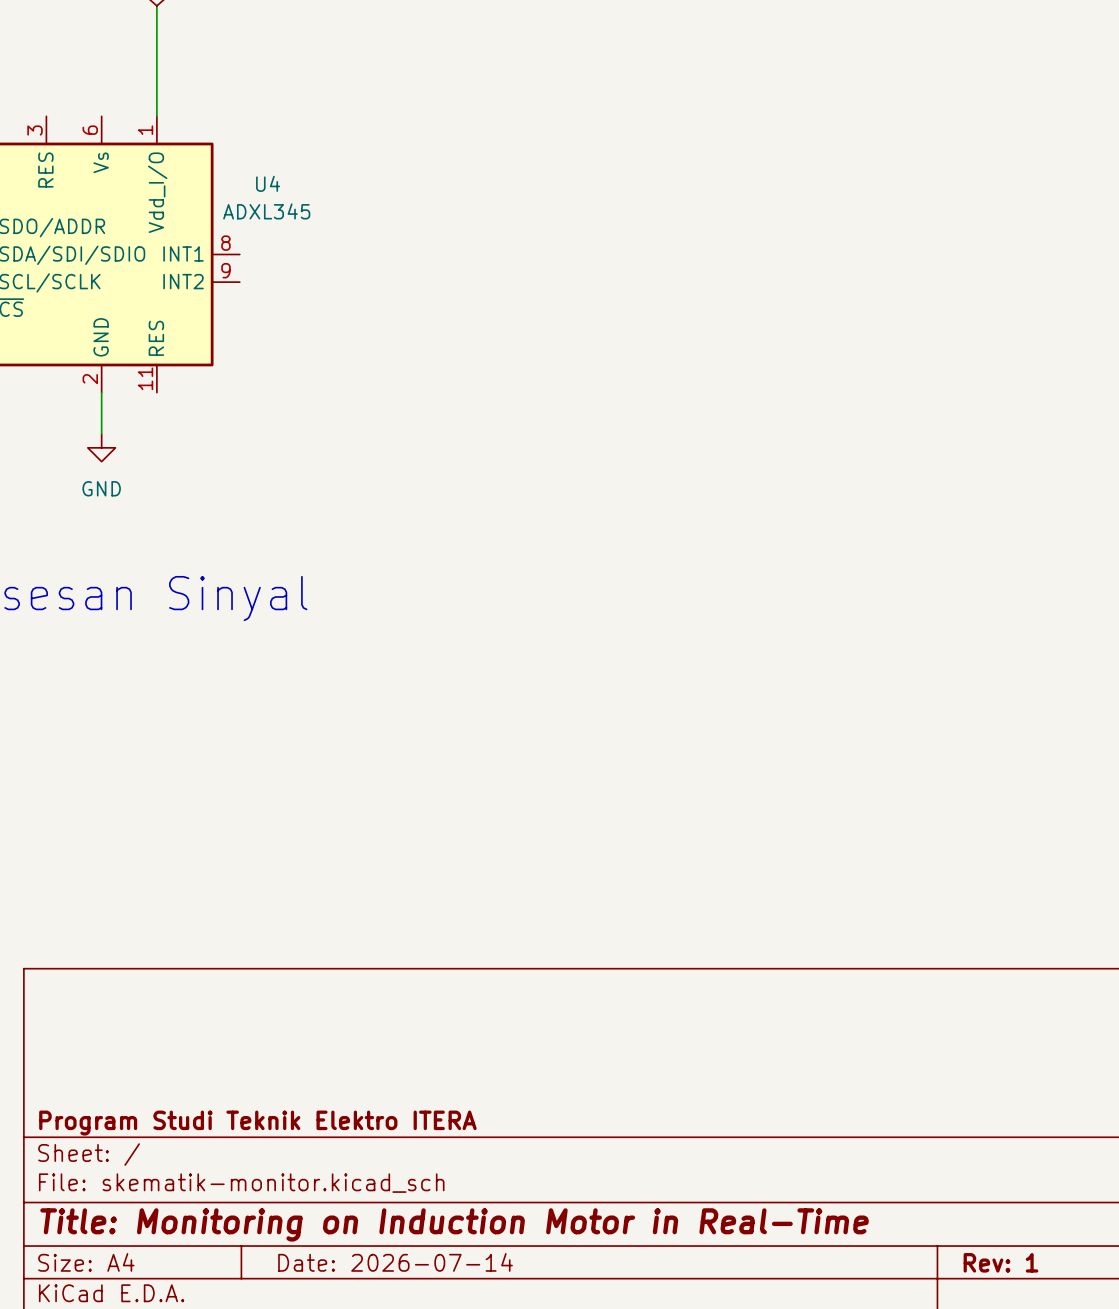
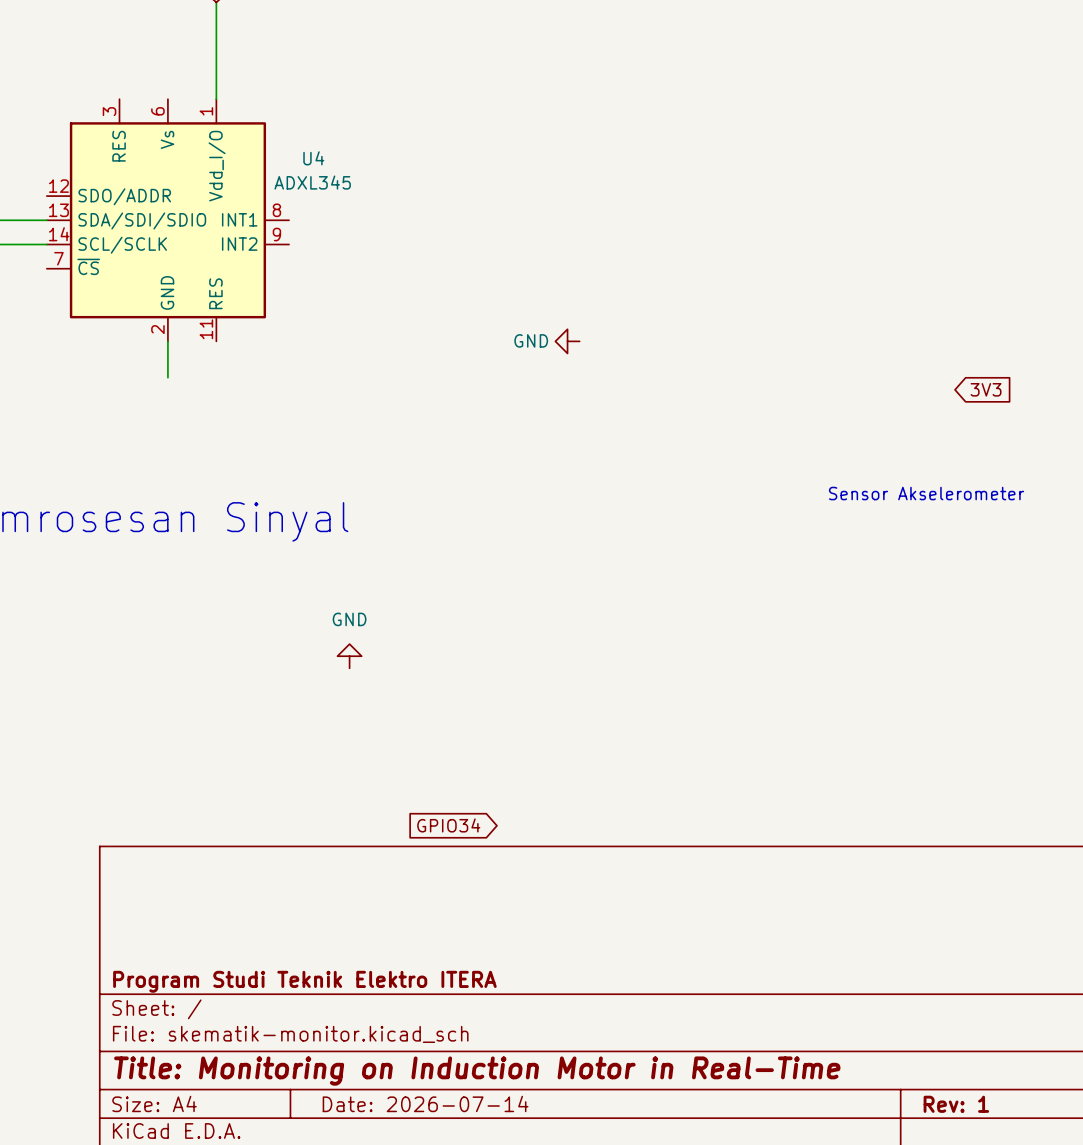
power symbol: none -> GND (567, 341)
power symbol: GND (101, 447) -> none
global label: none -> 3V3 (986, 389)
text: none -> Sensor Akselerometer (926, 493)
power symbol: none -> GND (349, 656)
global label: none -> GPIO34 (448, 825)

